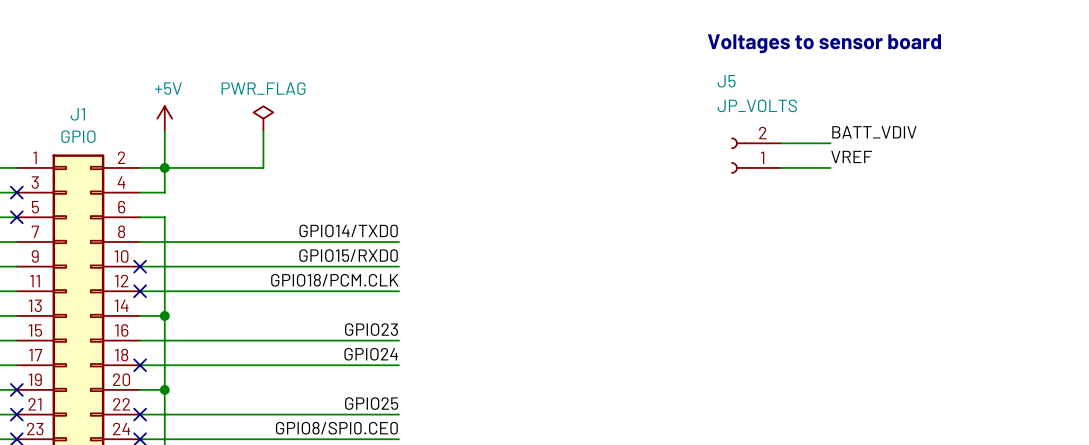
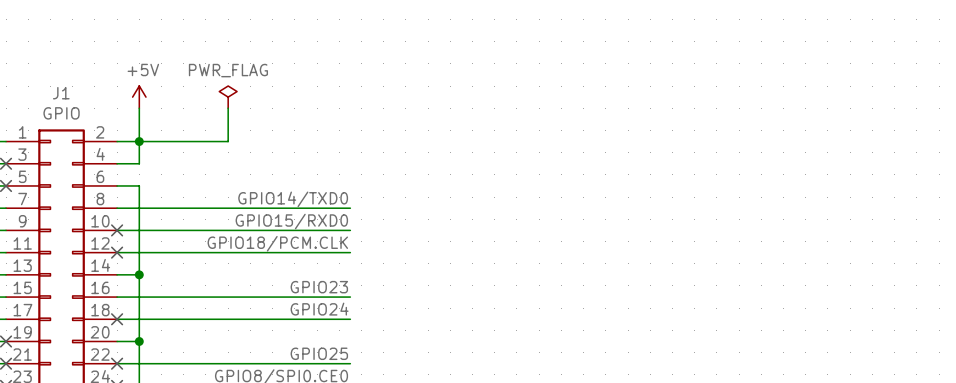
text: Voltages to sensor board (824, 43) -> none
label: BATT_VDIV (874, 132) -> none
wire: (781, 143) (830, 143) -> none
J5: JP_VOLTS (756, 155) -> none
label: VREF (851, 156) -> none
wire: (781, 167) (830, 167) -> none

